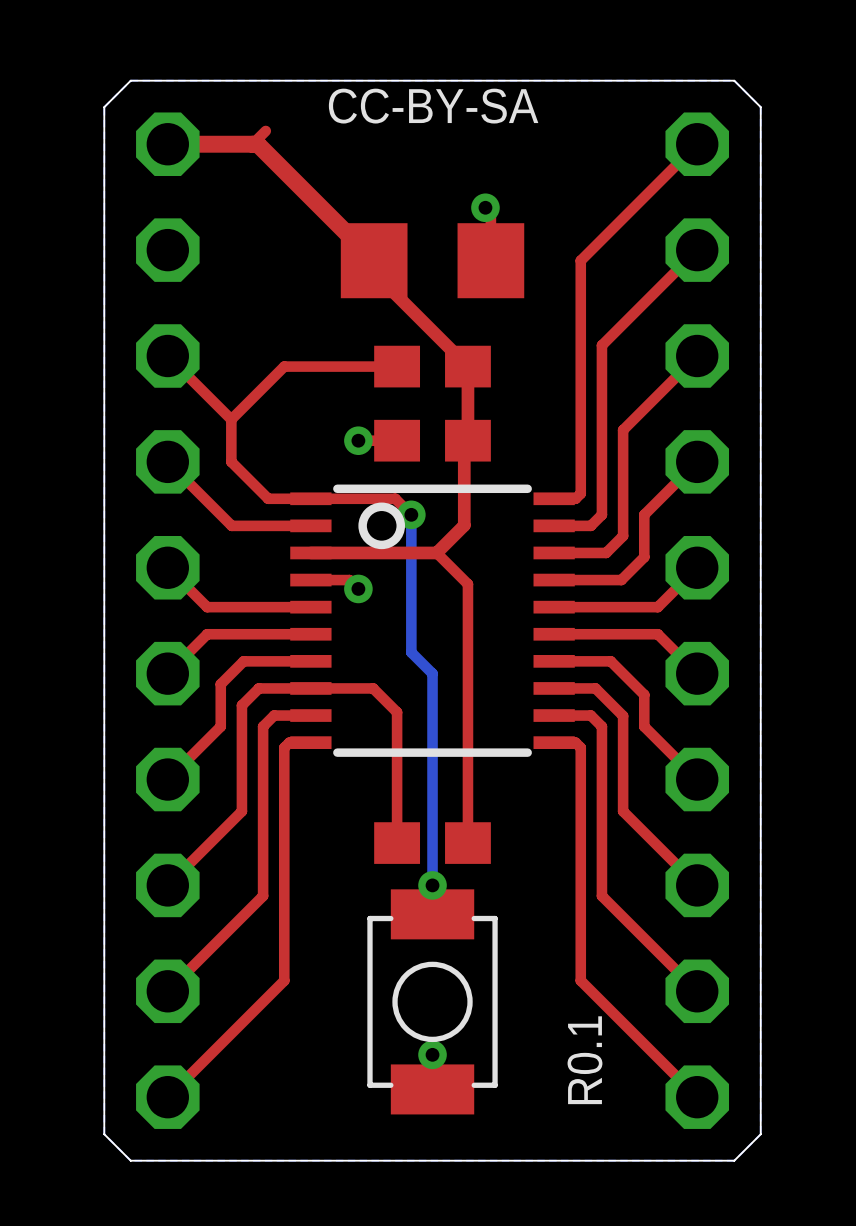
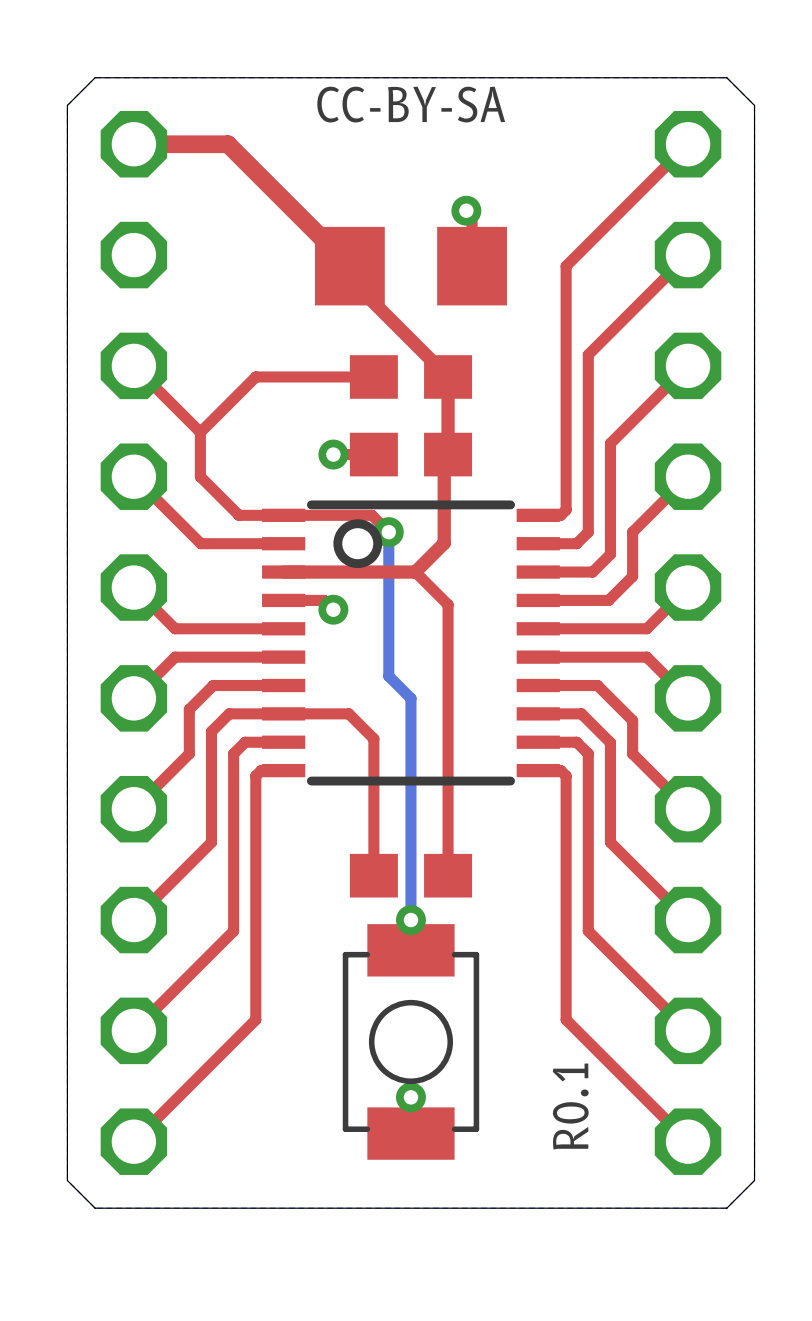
top track: (265, 130) (252, 144) -> none

